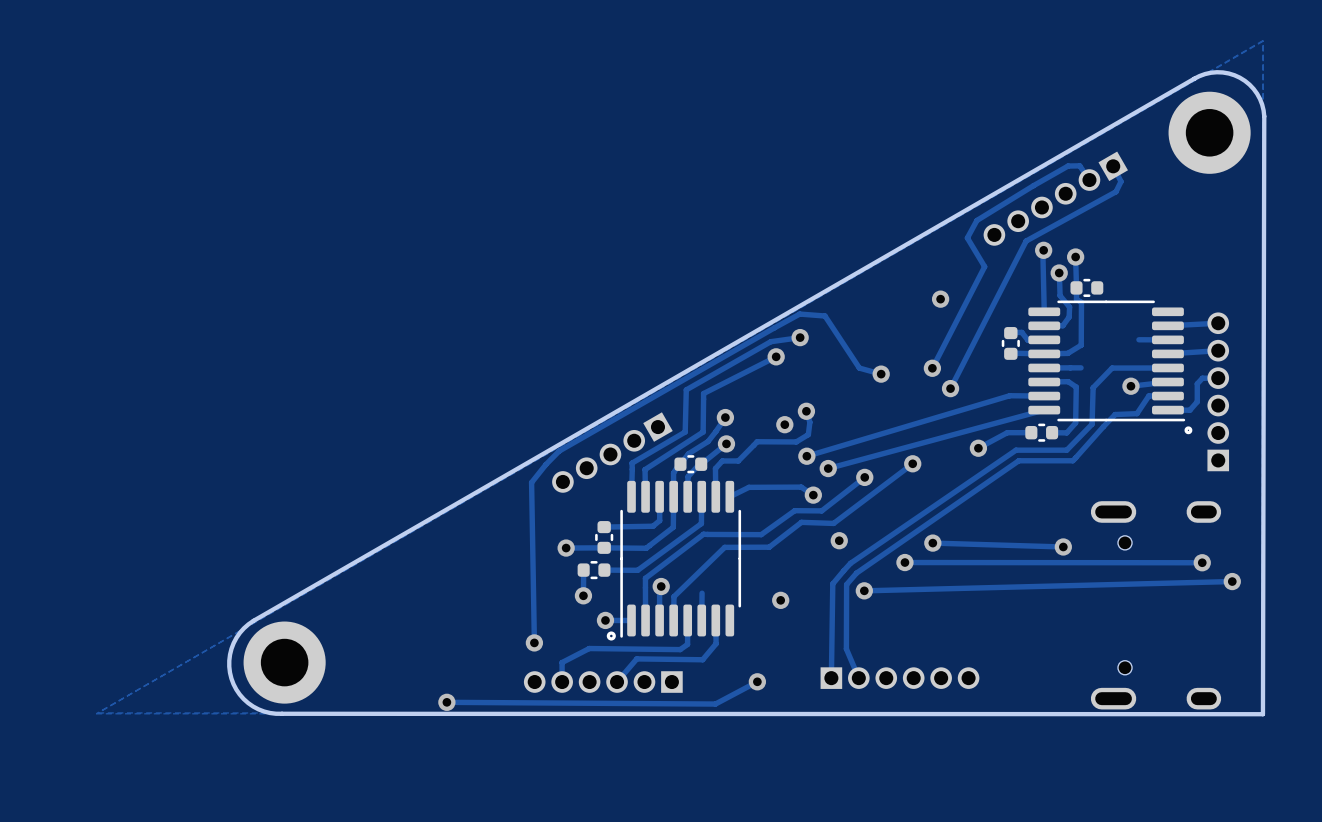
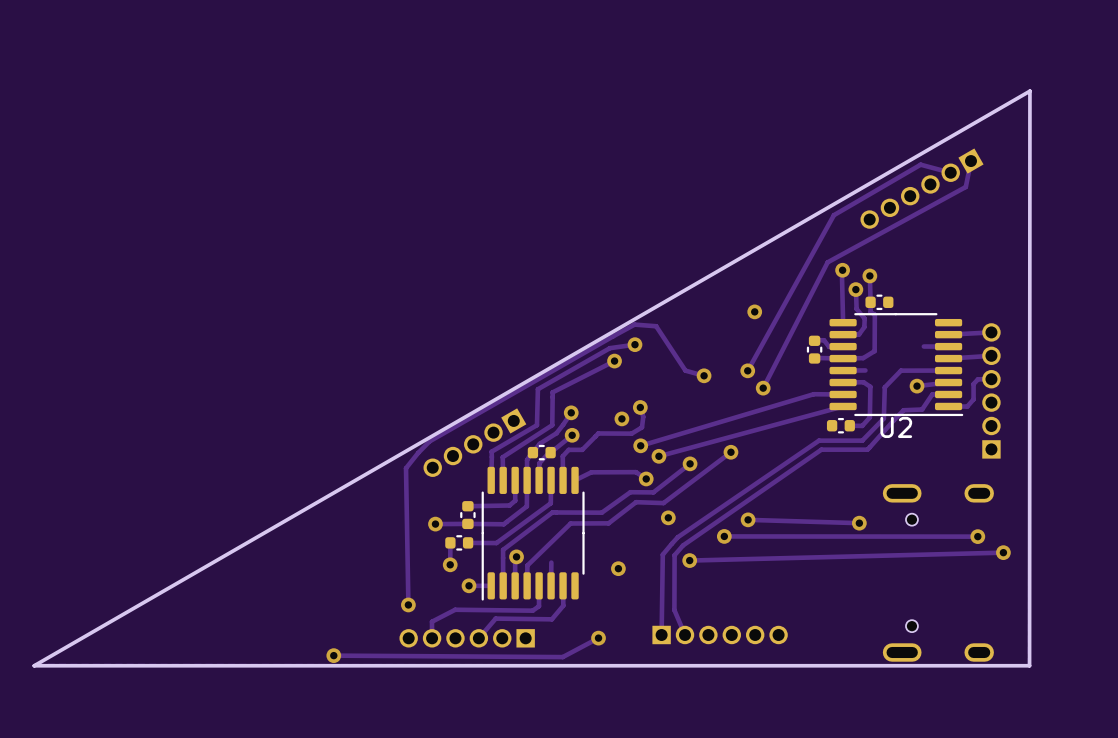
board edge: (1194, 78) (253, 620) (239, 632) (231, 648) (229, 666) (236, 689) (253, 706) (275, 713) (1262, 714) (1264, 116) (1262, 104) (1257, 93) (1249, 84) (1239, 77) (1228, 73) (1216, 72) (1205, 74) (1194, 78) -> (1029, 91) (1029, 665) (34, 665) (1029, 91)
part: (1209, 132) -> none
track: (1113, 166) (1121, 181) (1116, 191) (1026, 241) -> (970, 161) (965, 186) (827, 262)
track: (1089, 180) (1079, 165) (1068, 166) (976, 220) (967, 238) (984, 266) (932, 368) -> (950, 172) (920, 164) (833, 215) (747, 370)
part position: (1055, 198) -> (922, 188)
track: (1081, 367) (1070, 367) -> none
drawing: [1184, 426, 1193, 435] -> none
track: (1031, 432) (1007, 432) (978, 448) -> none
U2 name: none -> U2 (896, 427)
via: (978, 448) -> none
drawing: [606, 631, 616, 641] -> none
part: (284, 662) -> none

